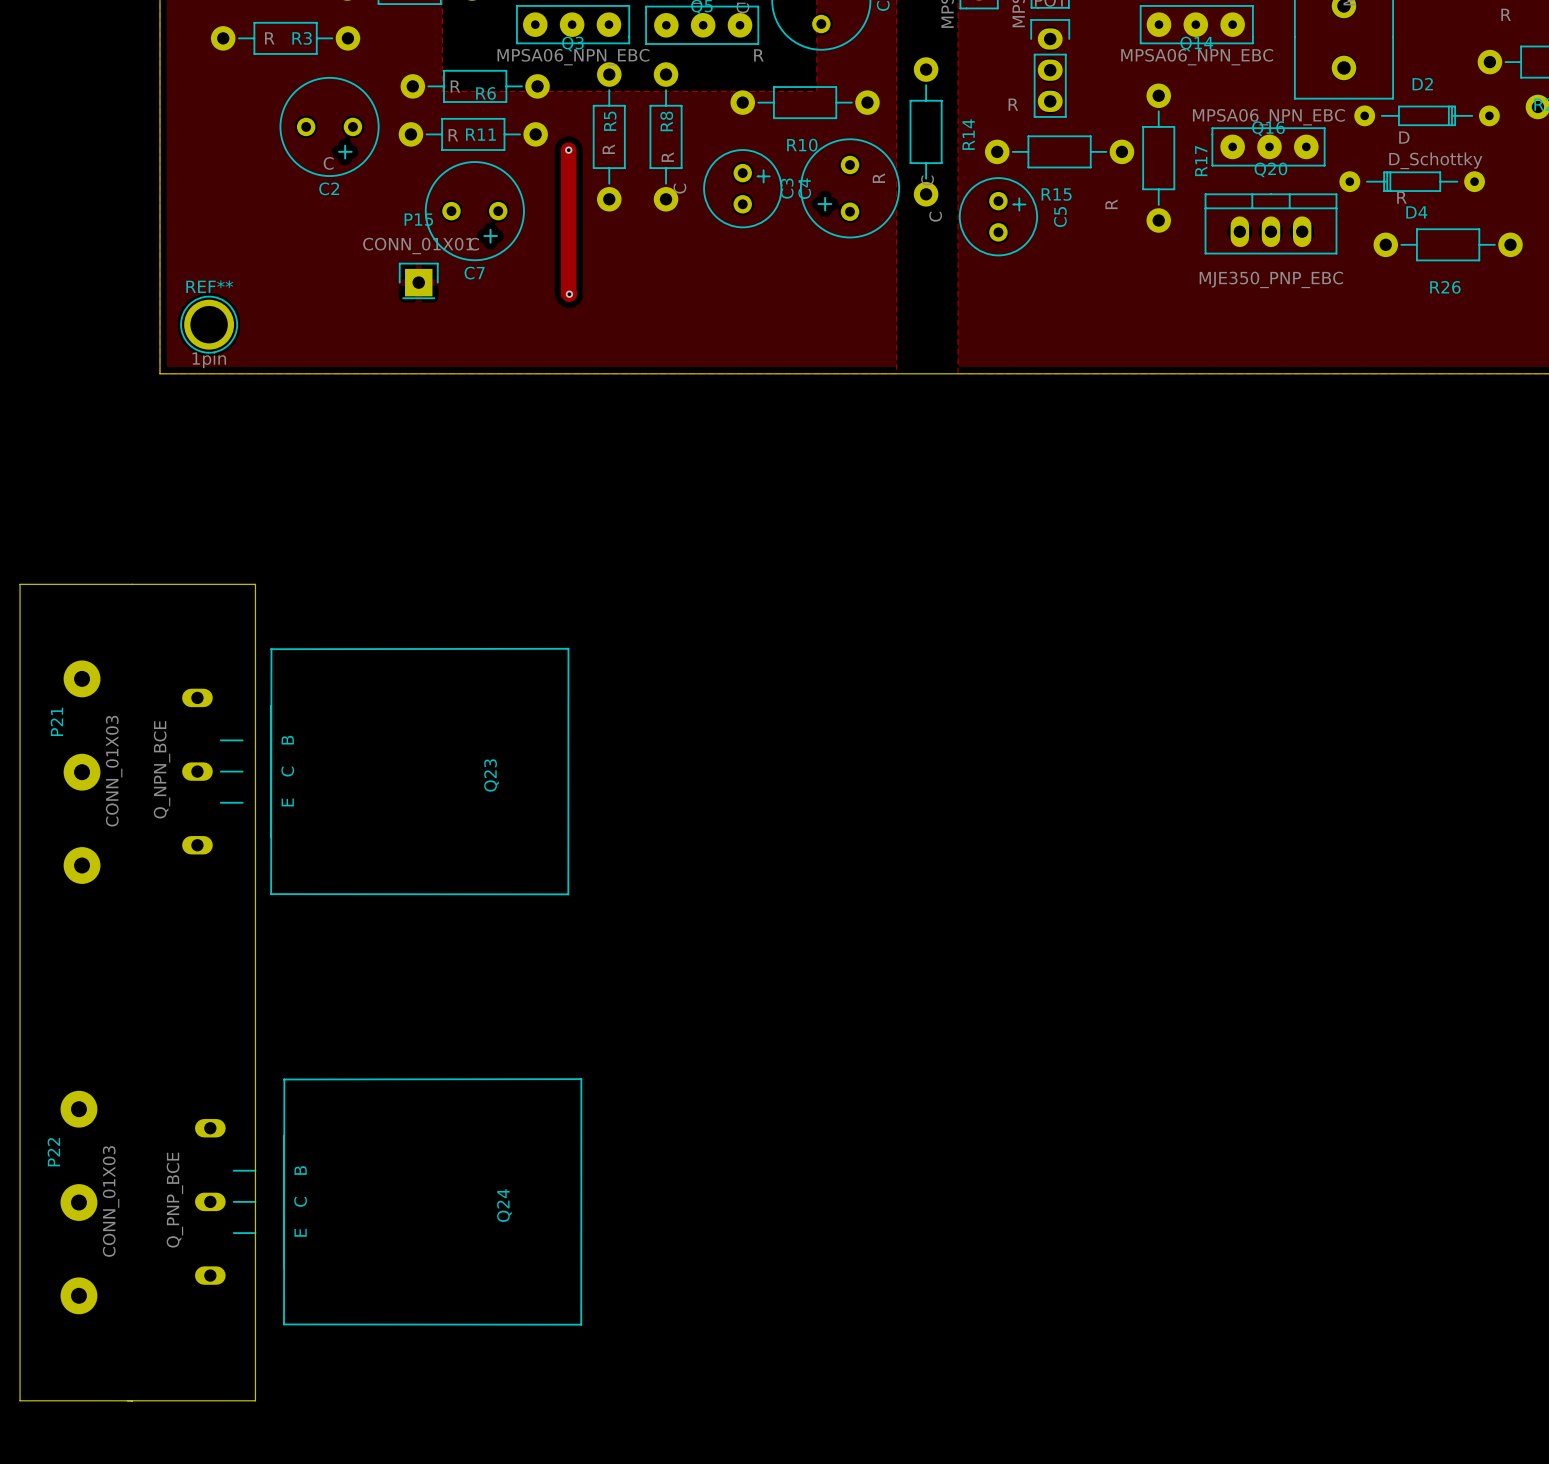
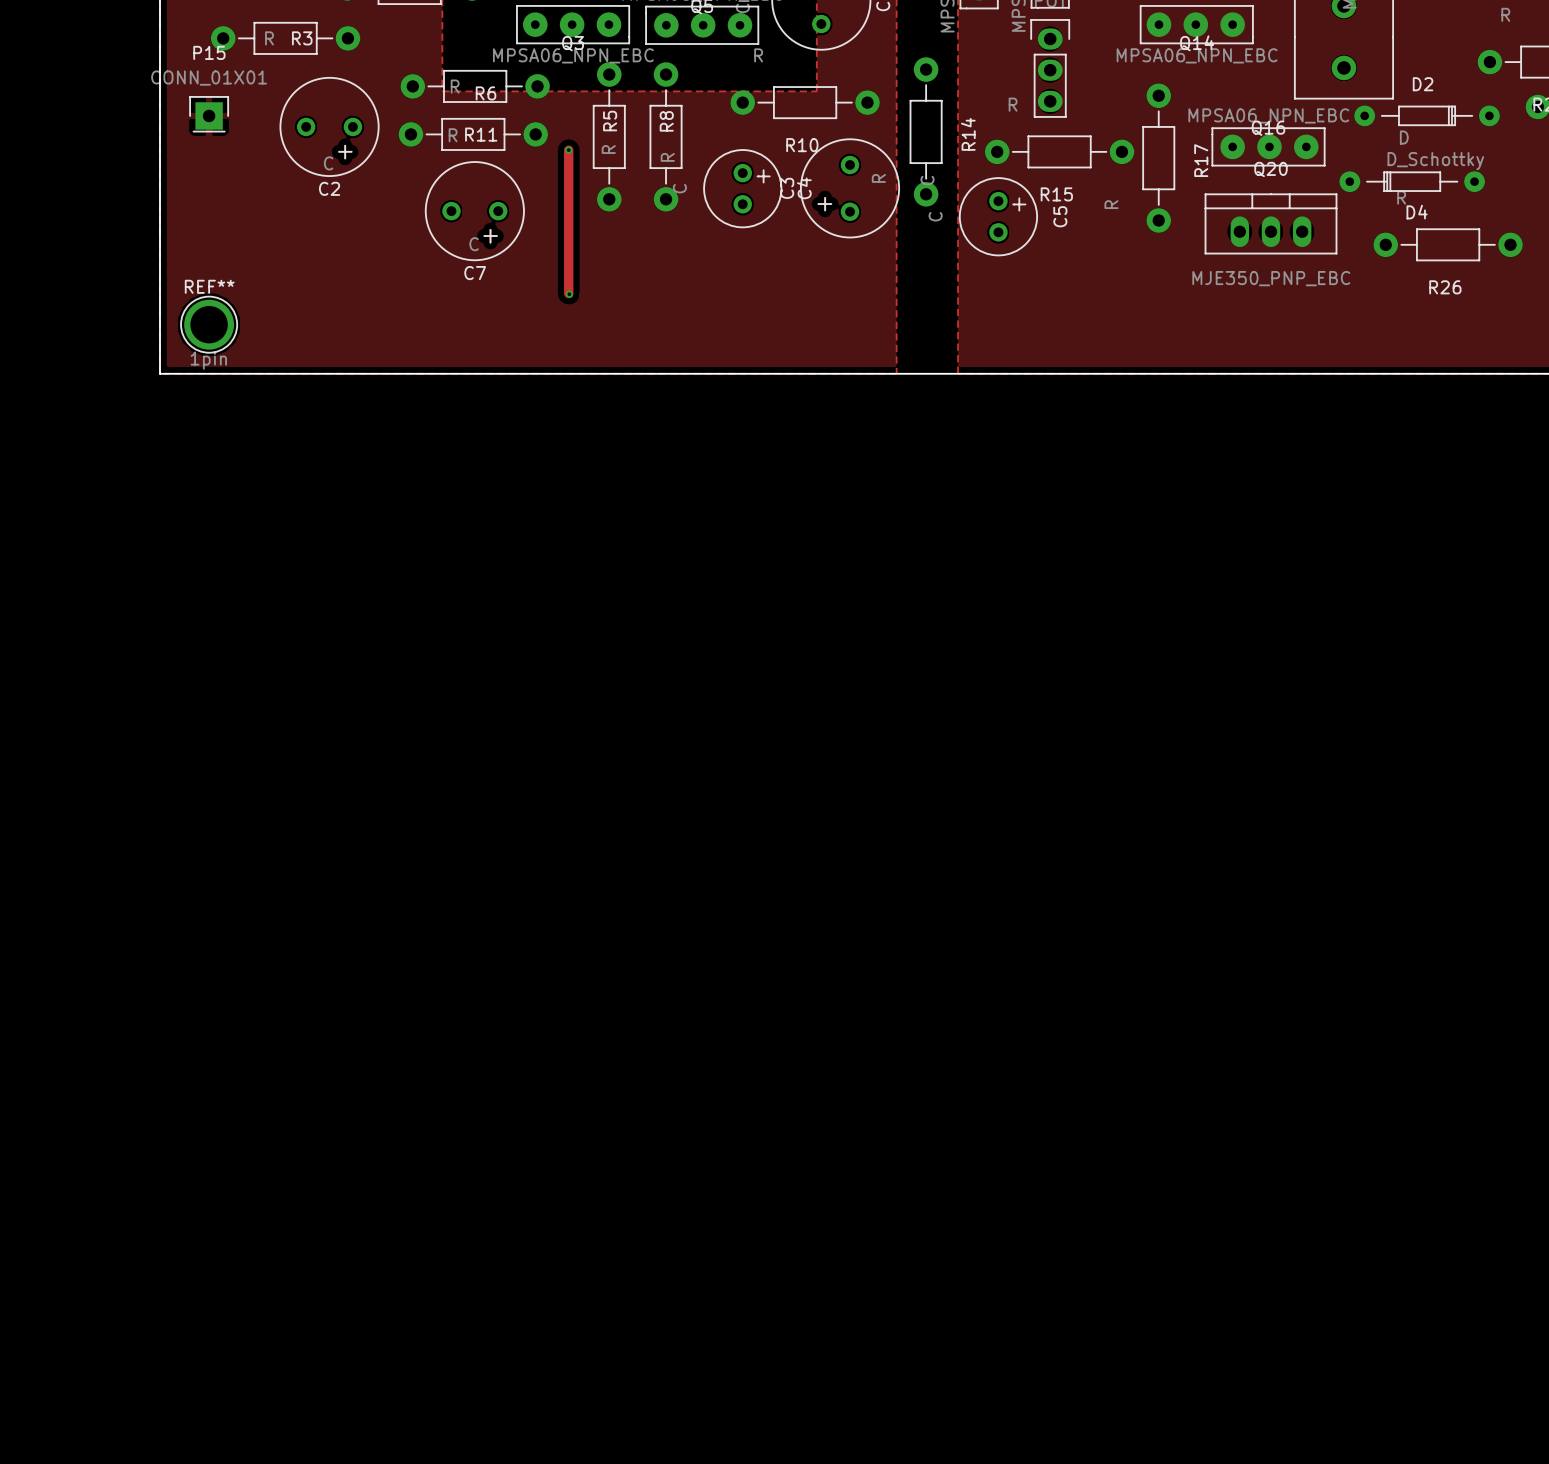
track width: thick (568, 150) (569, 294) -> thin (568, 150) (569, 294)
P15 position: (418, 280) -> (209, 114)
board edge: (20, 584) (255, 584) (255, 1400) (20, 1400) (20, 584) -> none
Q23: Q_NPN_BCE (375, 771) -> none
P21: CONN_01X03 (82, 772) -> none
Q24: Q_PNP_BCE (388, 1201) -> none
P22: CONN_01X03 (78, 1202) -> none

